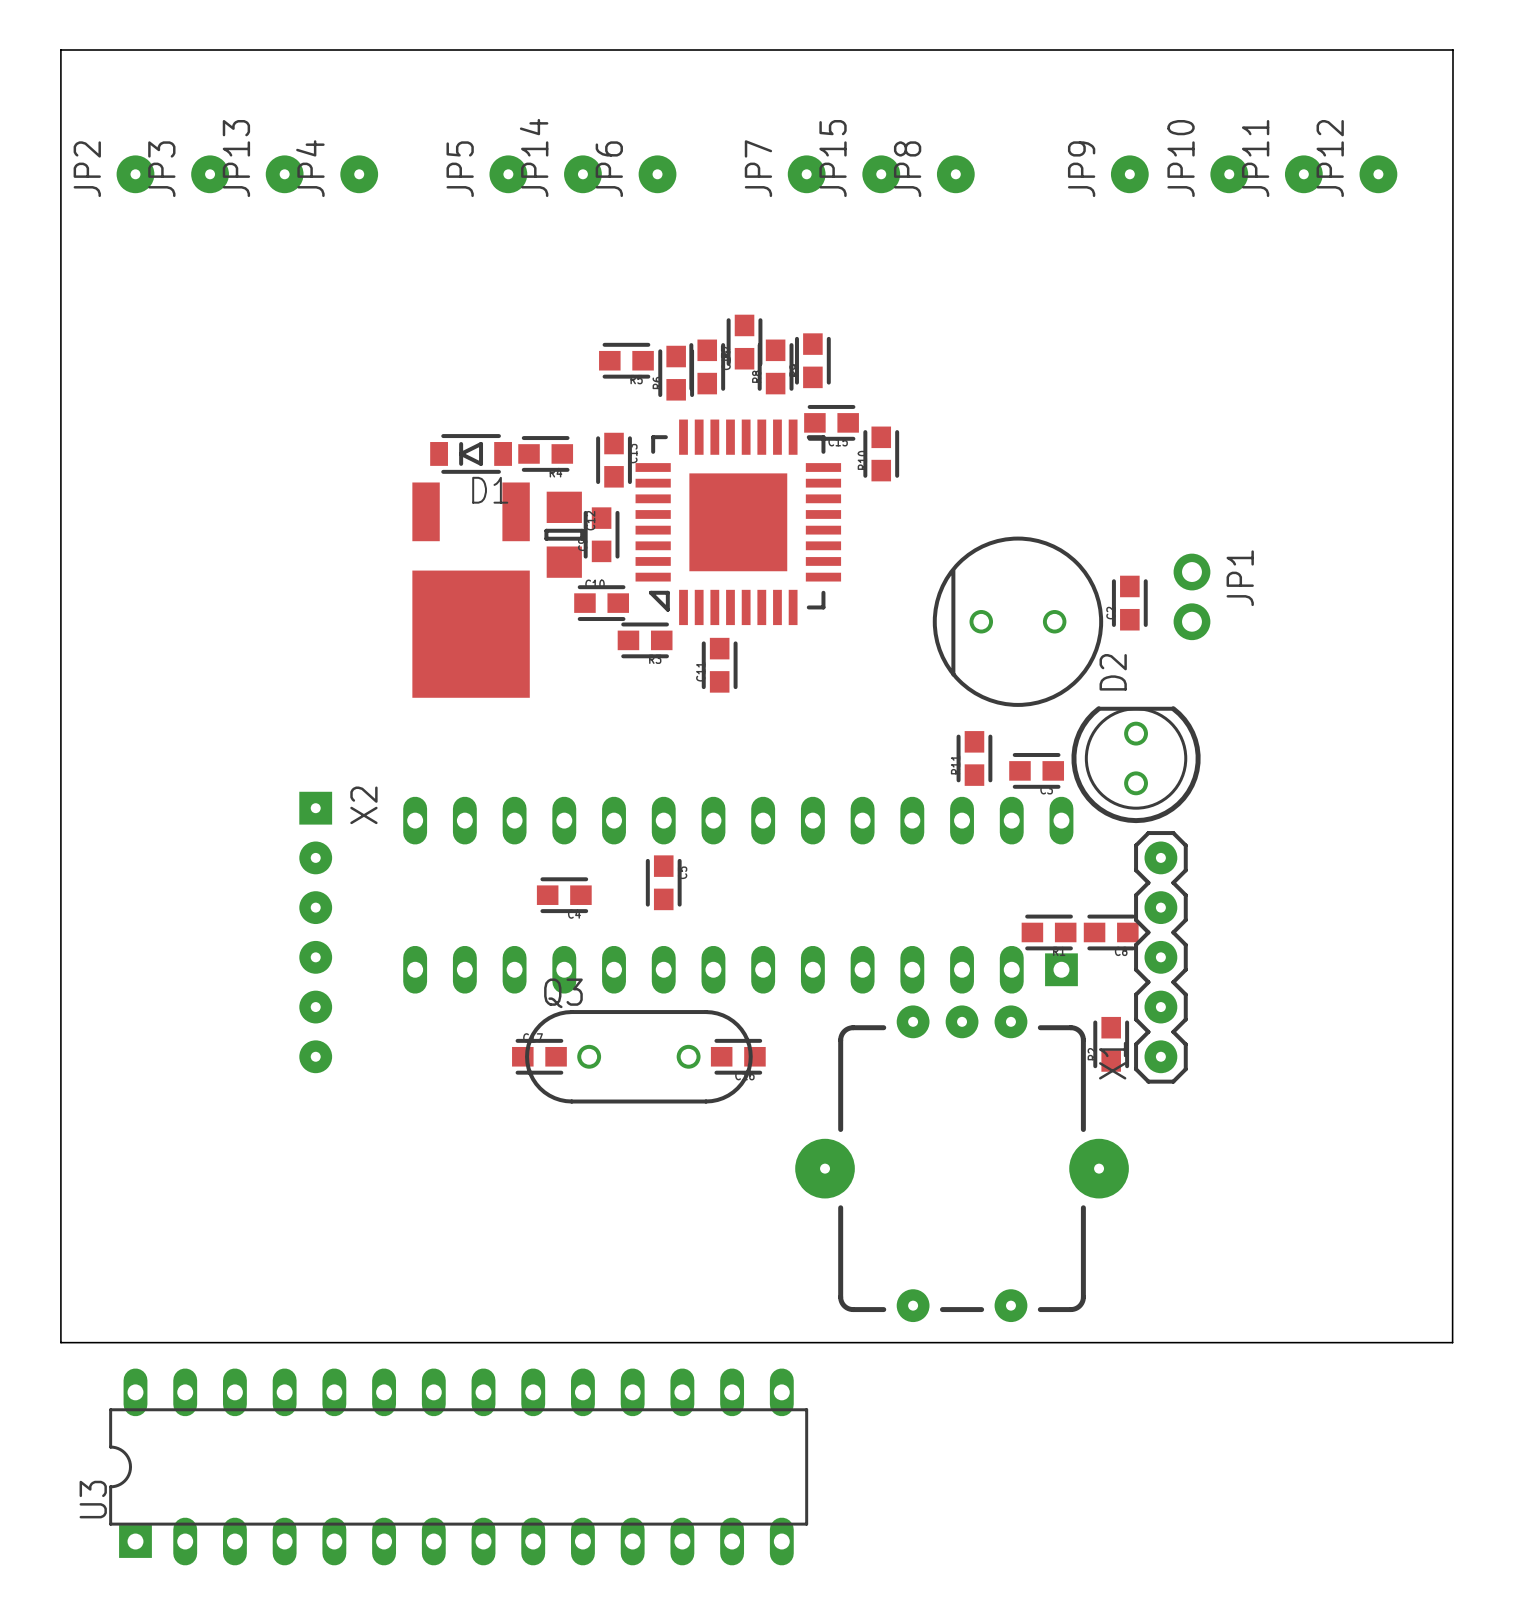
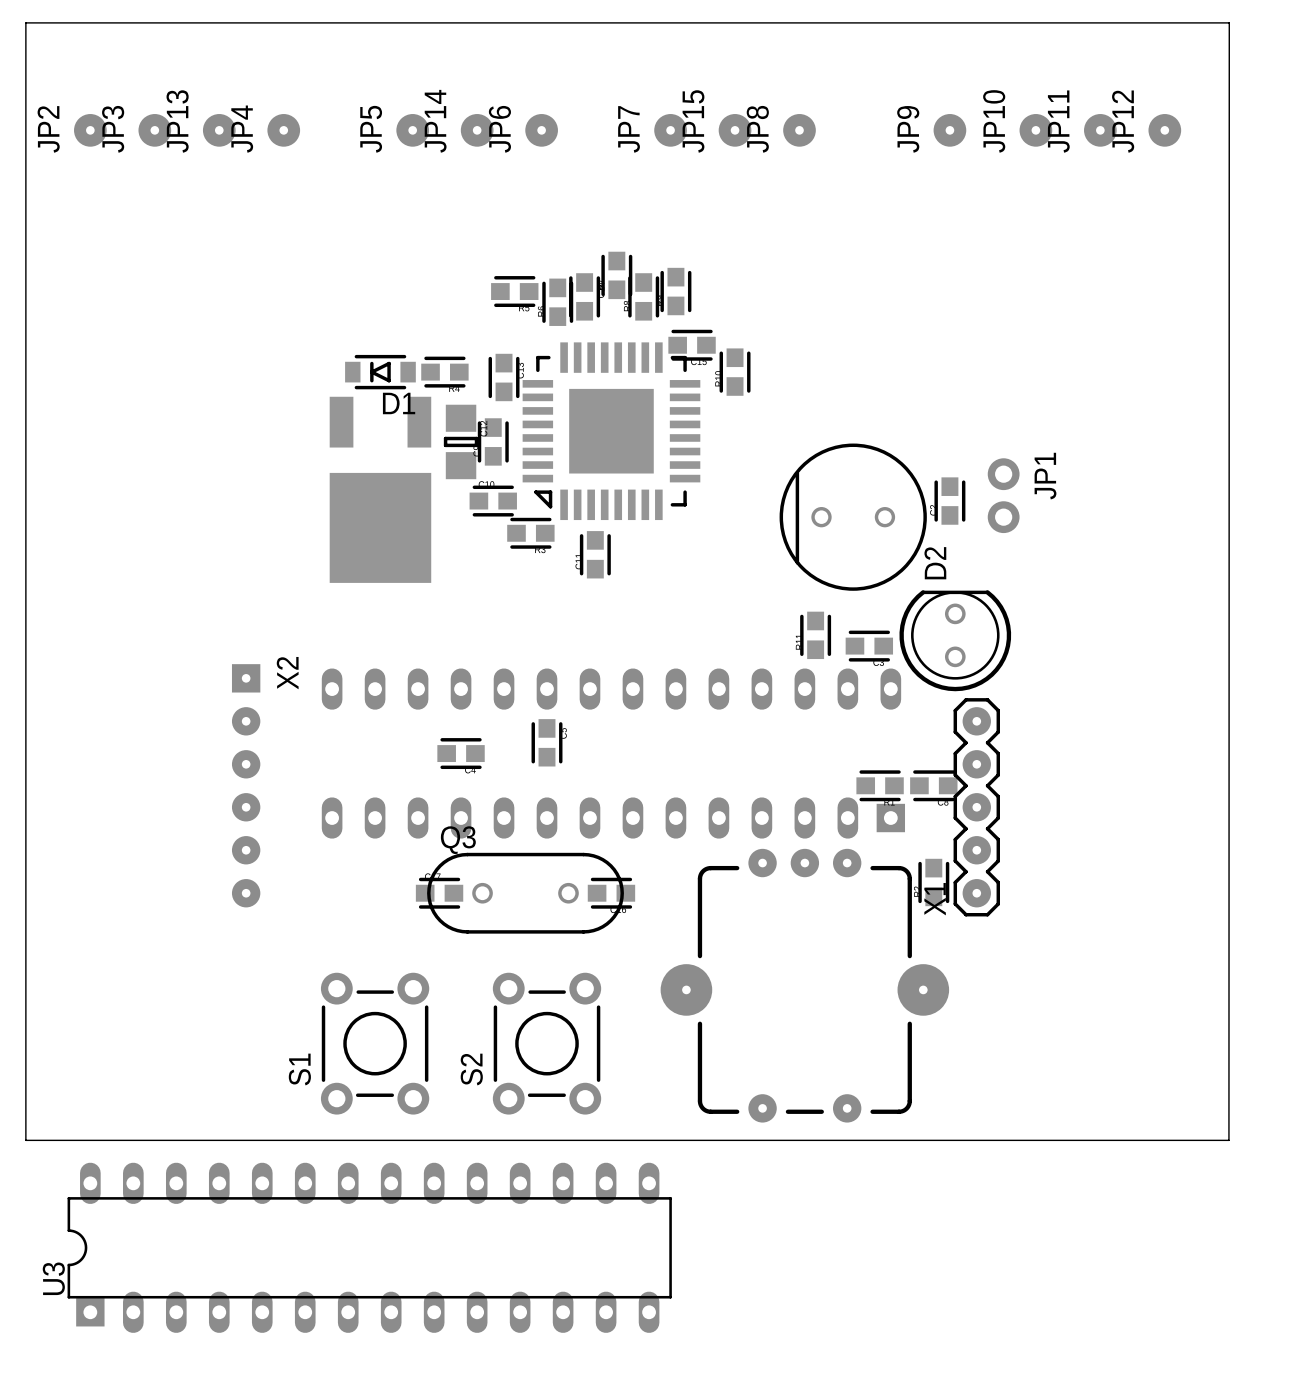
S1: none -> (375, 1043)
S2: none -> (547, 1043)

